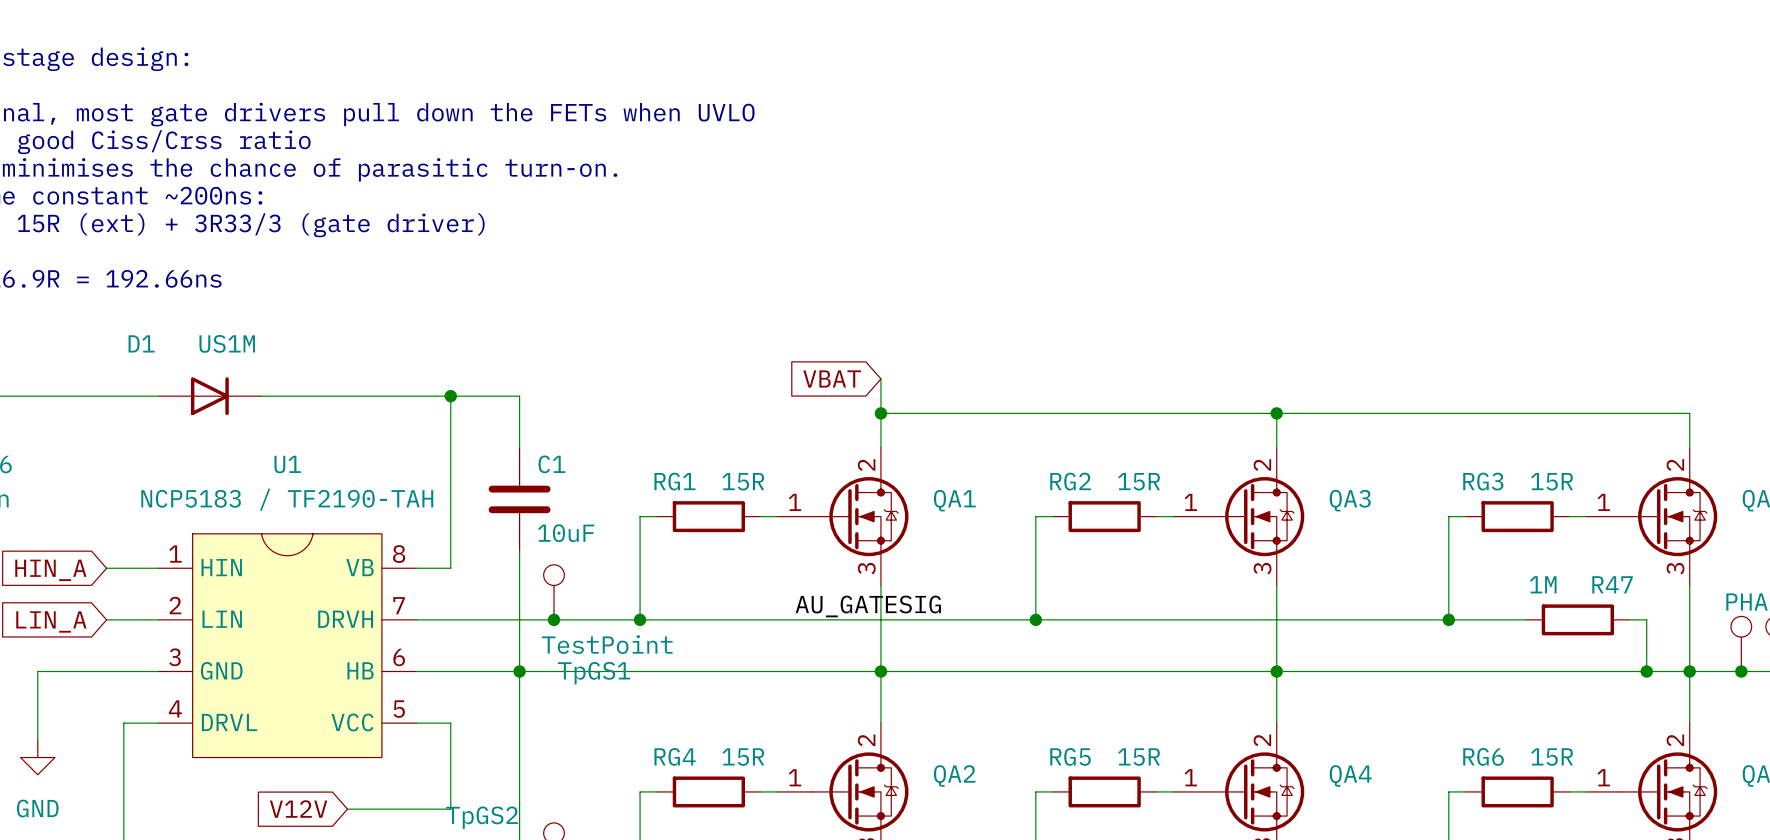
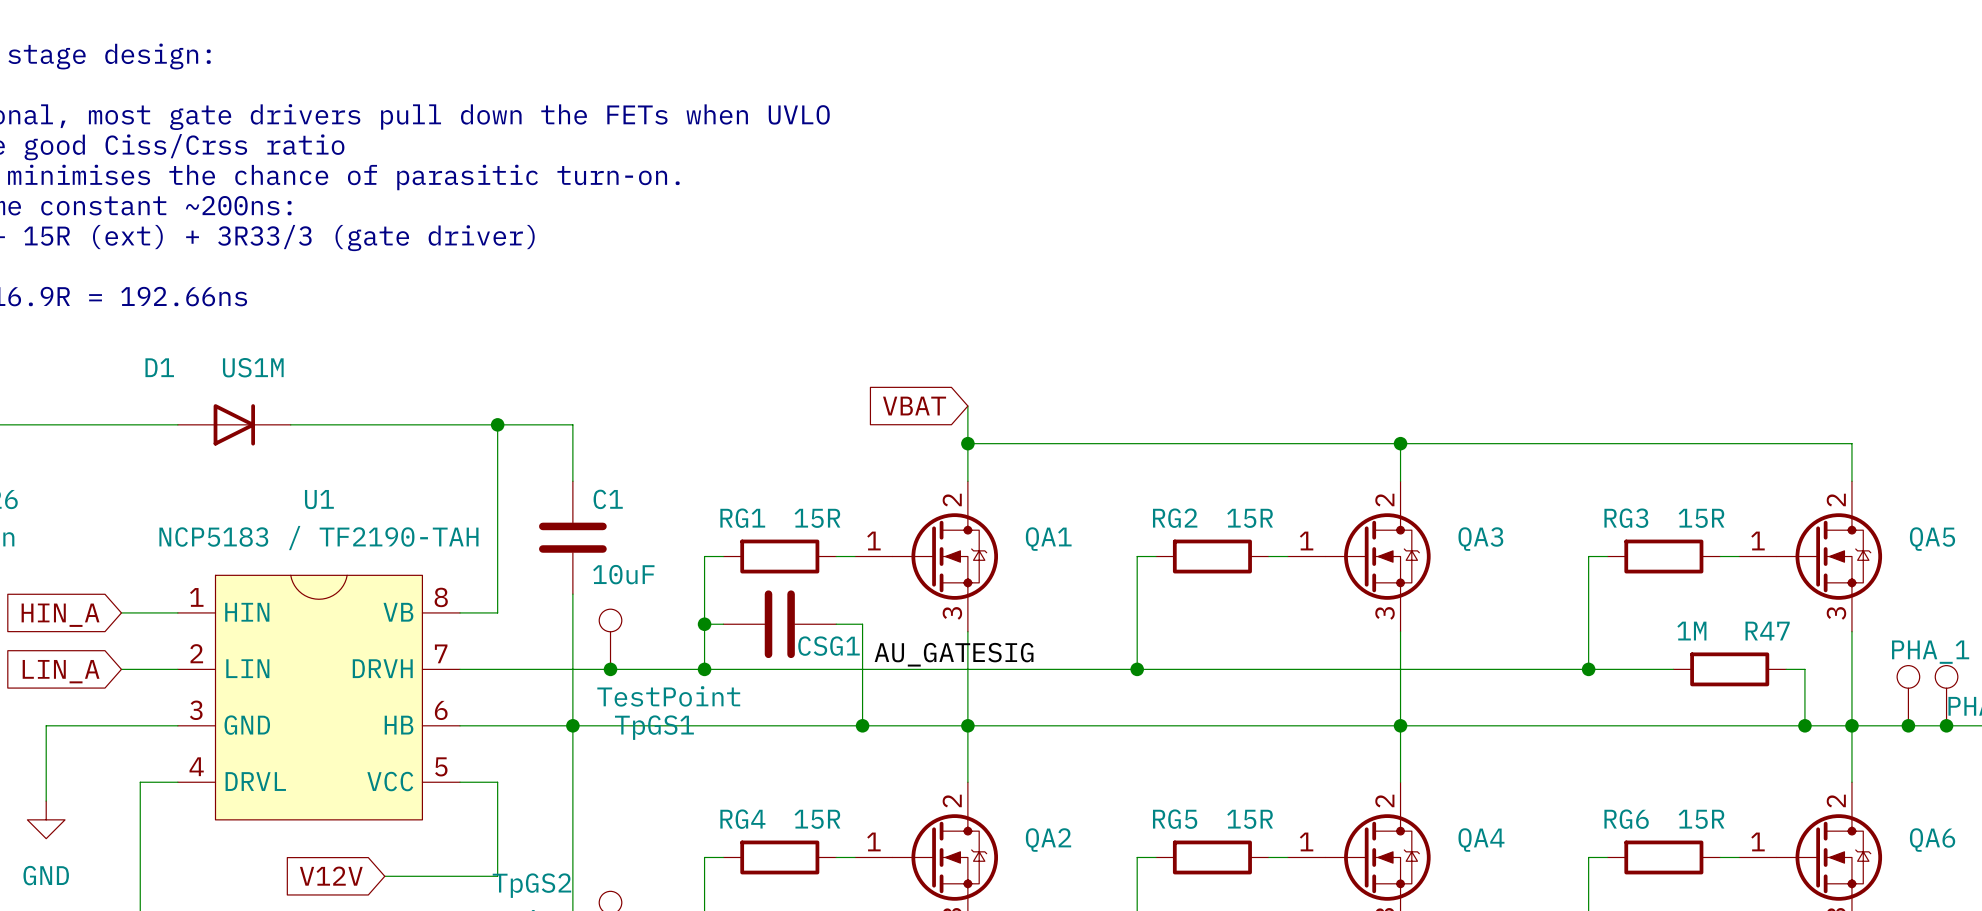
wire: none -> (704, 624) (723, 624)
junction: none -> (704, 624)
CSG1: none -> (779, 624)
wire: none -> (836, 624) (862, 624) (862, 725)
junction: none -> (862, 725)

